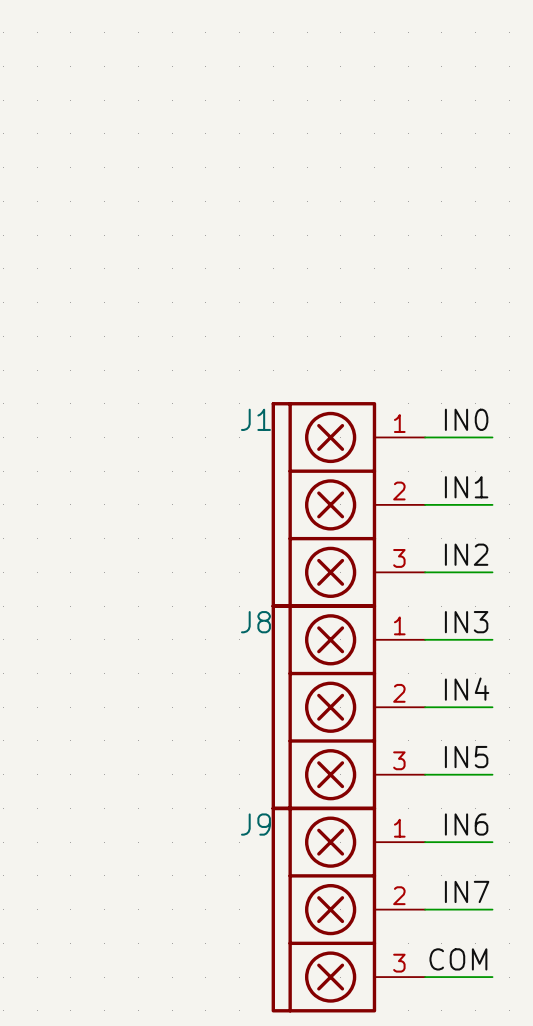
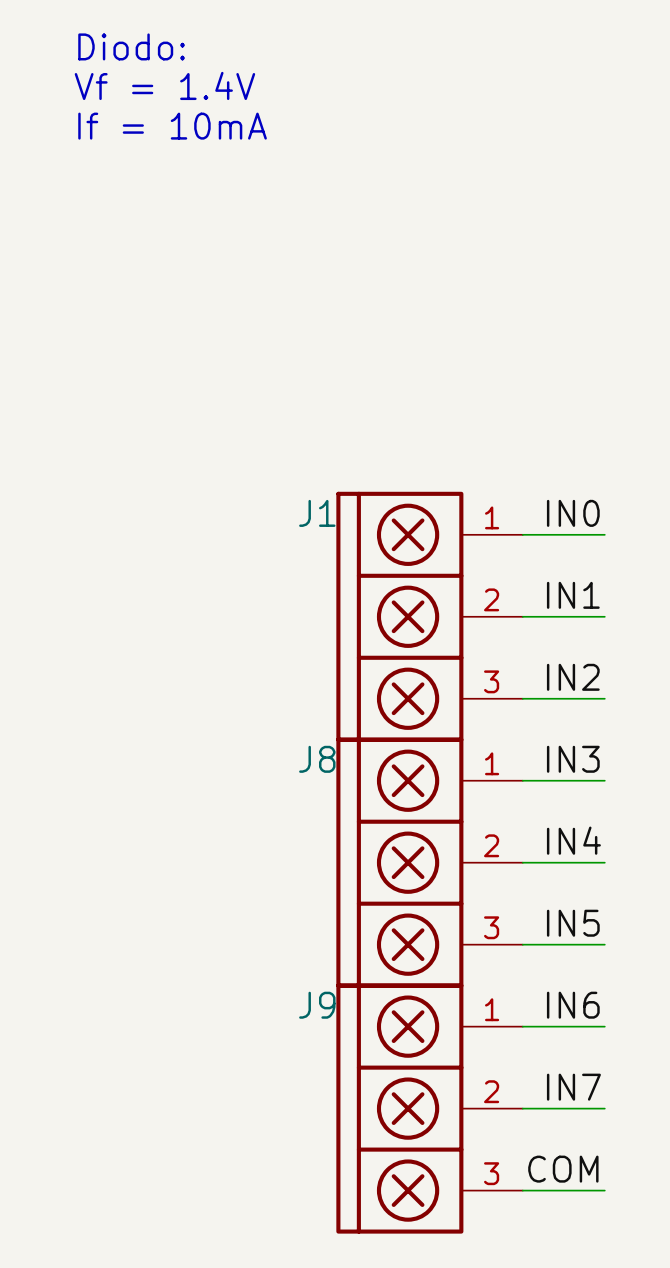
text: none -> Diodo: (131, 46)
text: none -> Vf = 1.4V (164, 85)
text: none -> If = 10mA (172, 126)

